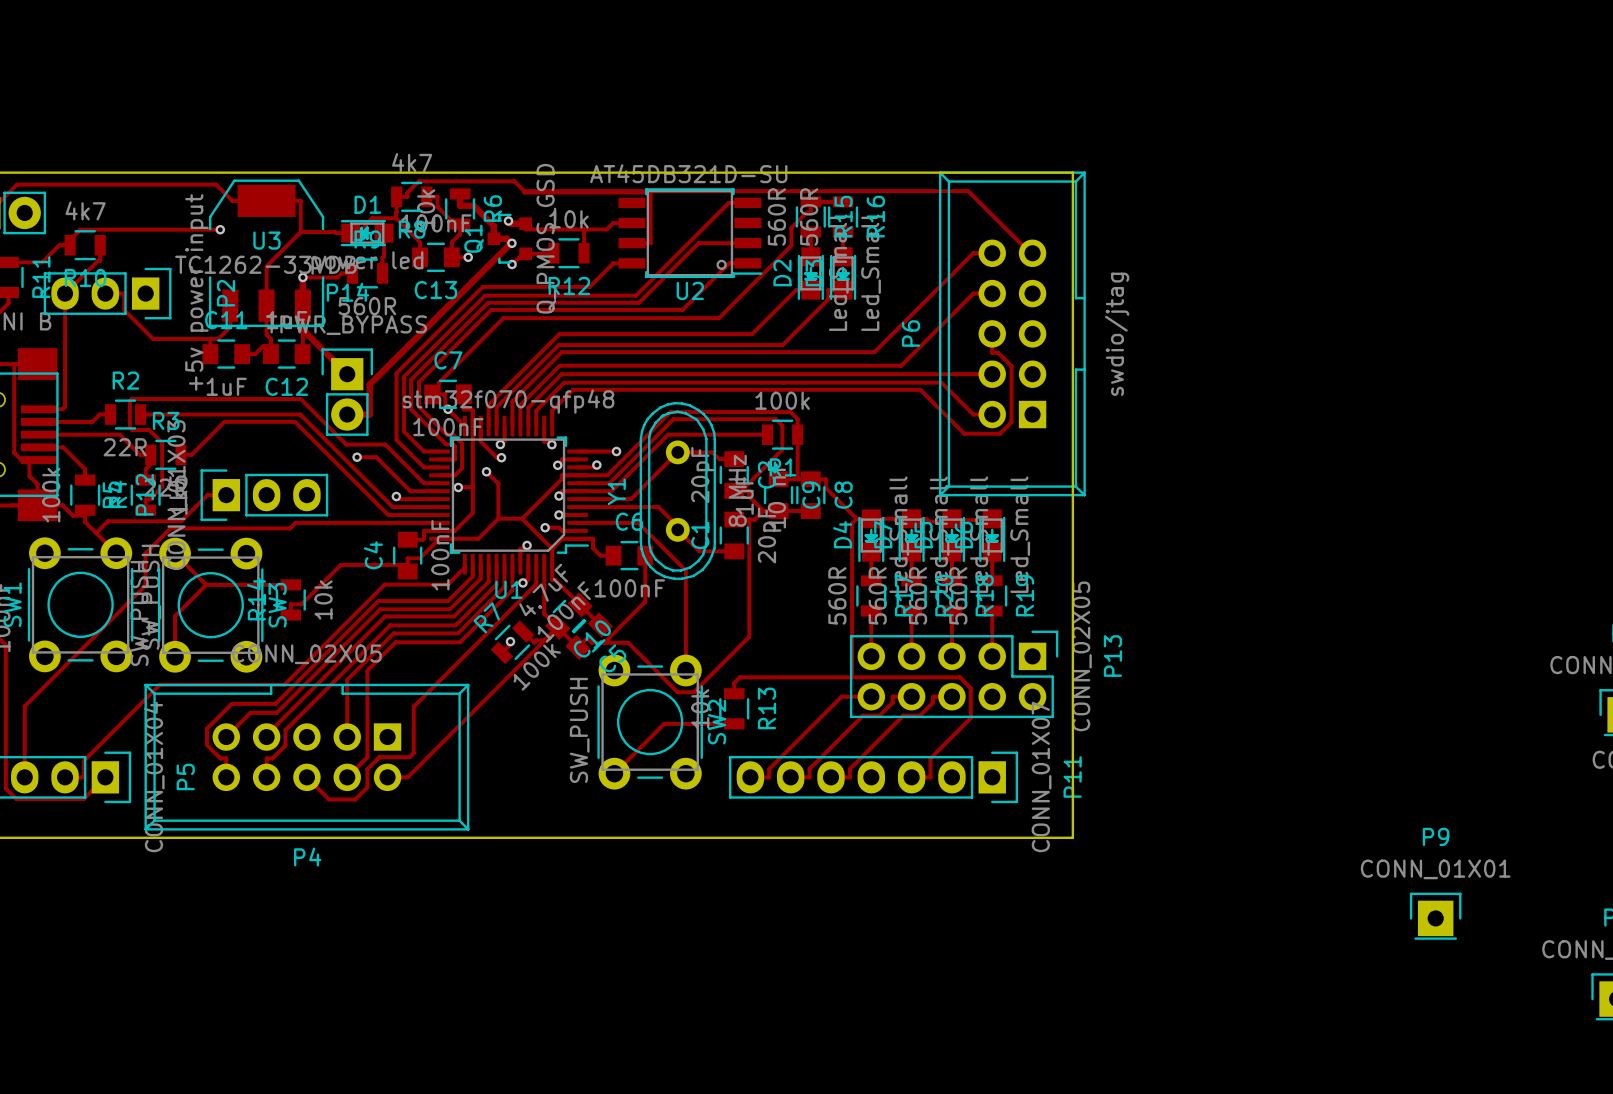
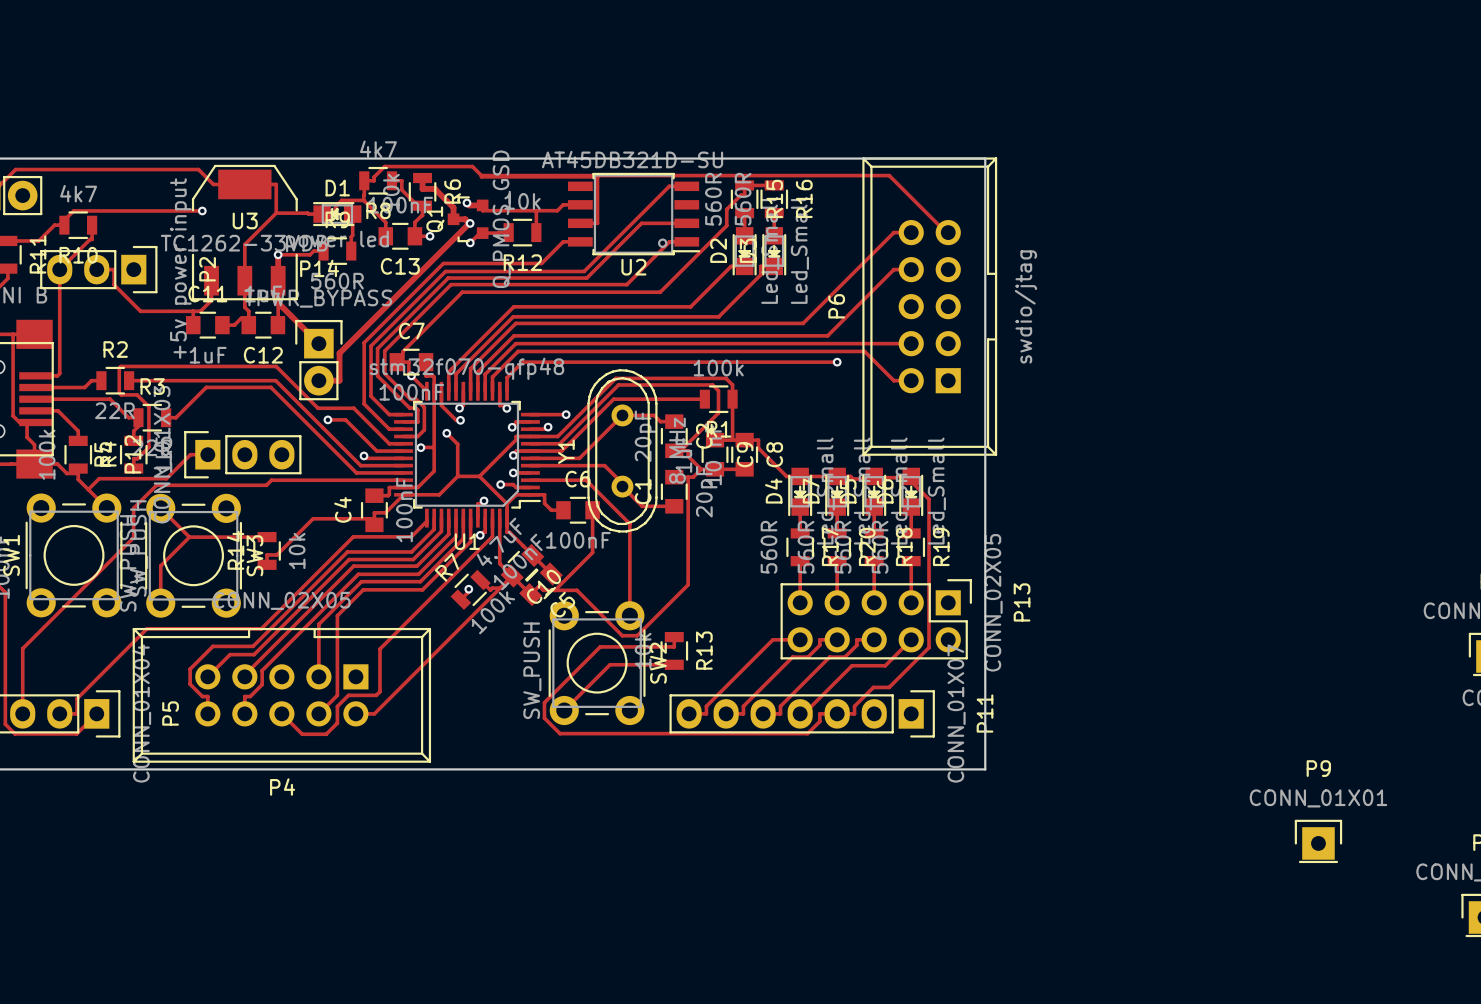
track: (992, 333) (992, 352) (998, 352) (1011, 366) (1011, 422) (999, 433) (964, 433) (920, 389) (572, 389) (552, 411) -> (837, 362) (522, 362) (507, 377)
via: none -> (837, 362)
track: (856, 518) (852, 523) (852, 677) -> none
track: none -> (906, 476) (929, 499) (929, 647) (889, 687) (873, 687) (854, 706)
track: (734, 693) (734, 683) (739, 677) (959, 677) (970, 688) (970, 718) -> (674, 637) (674, 646) (600, 646) (544, 702) (544, 718) (559, 733) (807, 733) (819, 721) (819, 713) (837, 713)
track: none -> (911, 639) (891, 659)
track: (964, 724) (930, 758) (930, 769) -> (885, 665) (852, 665) (803, 713) (800, 713)

